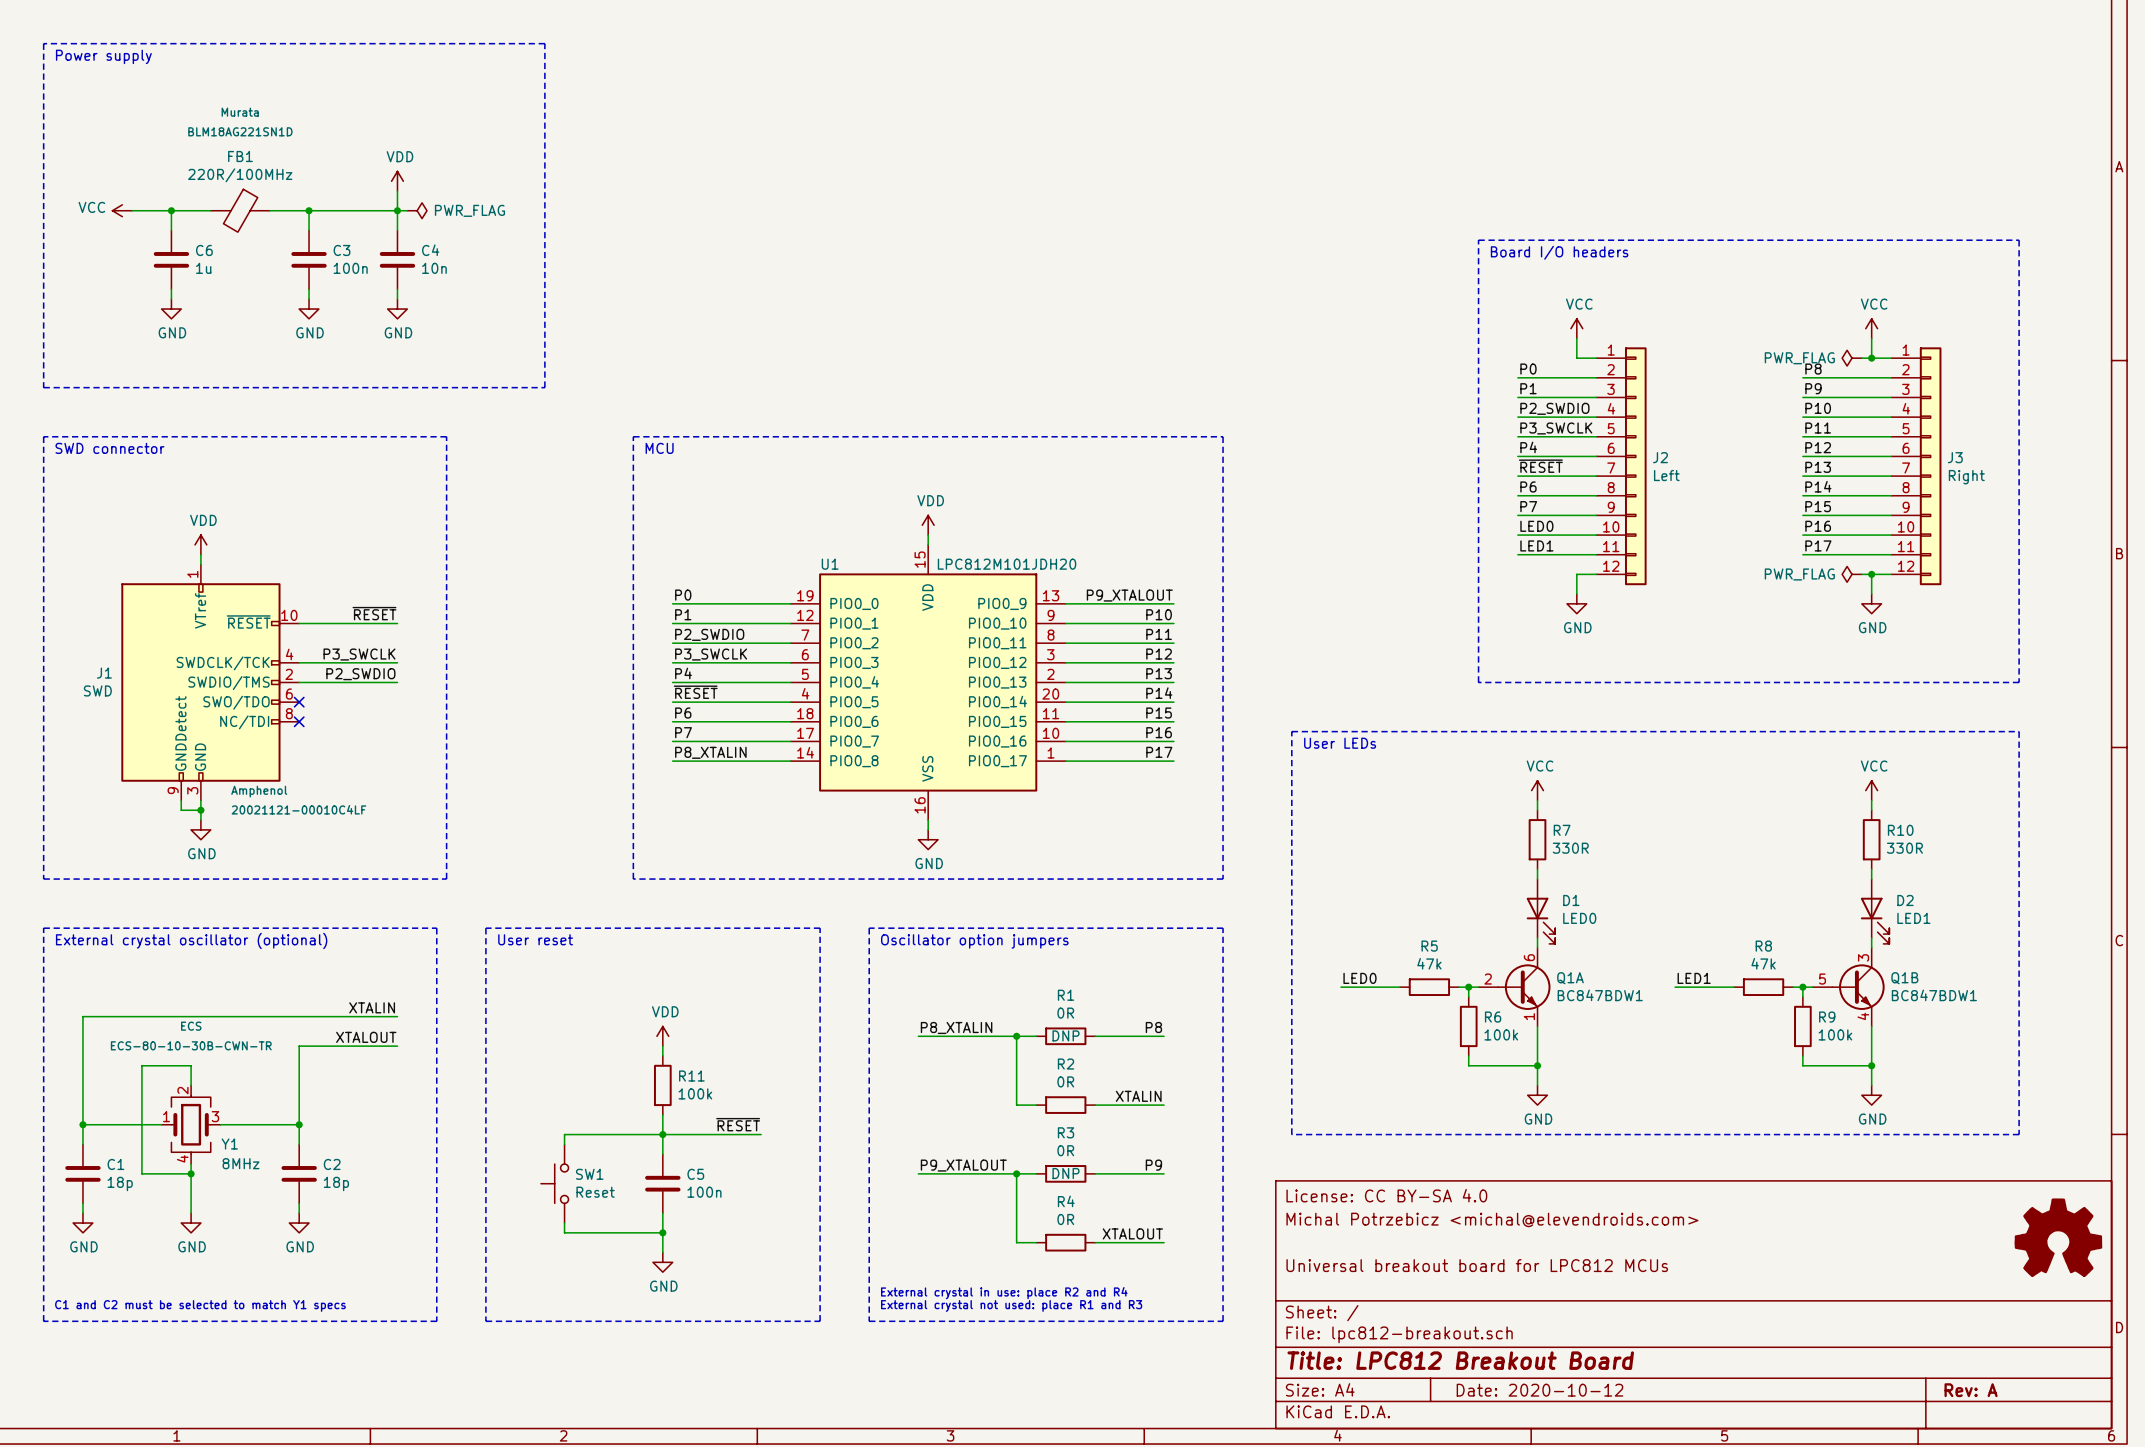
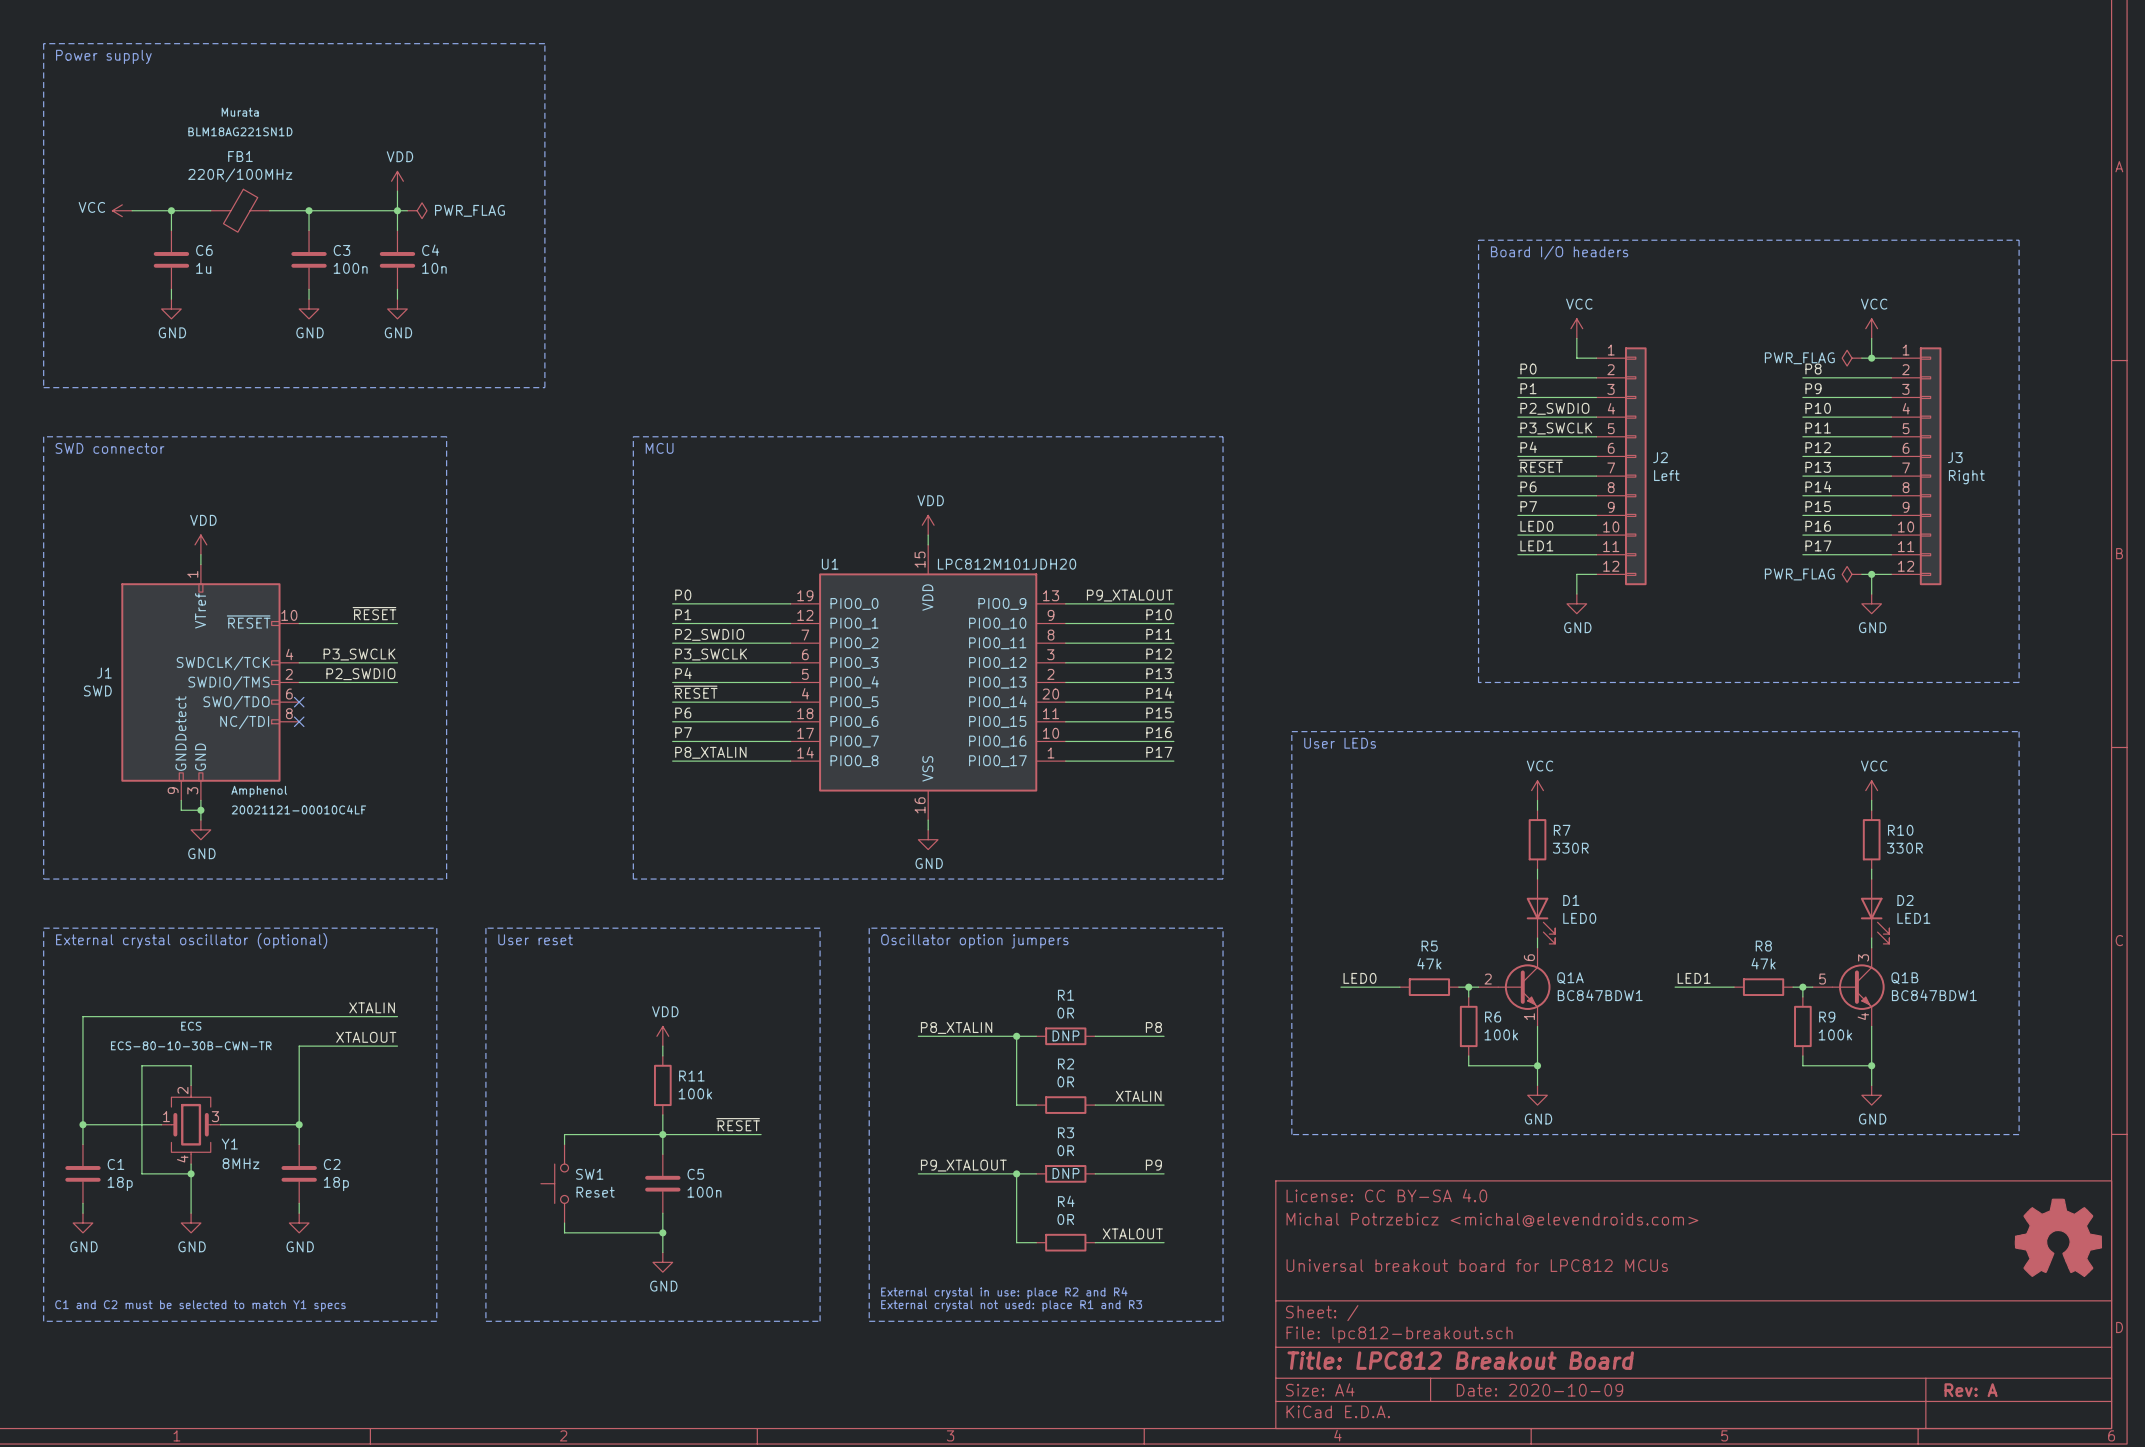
title block: Date: 2020-10-12 (1539, 1390) -> Date: 2020-10-09 (1539, 1390)

